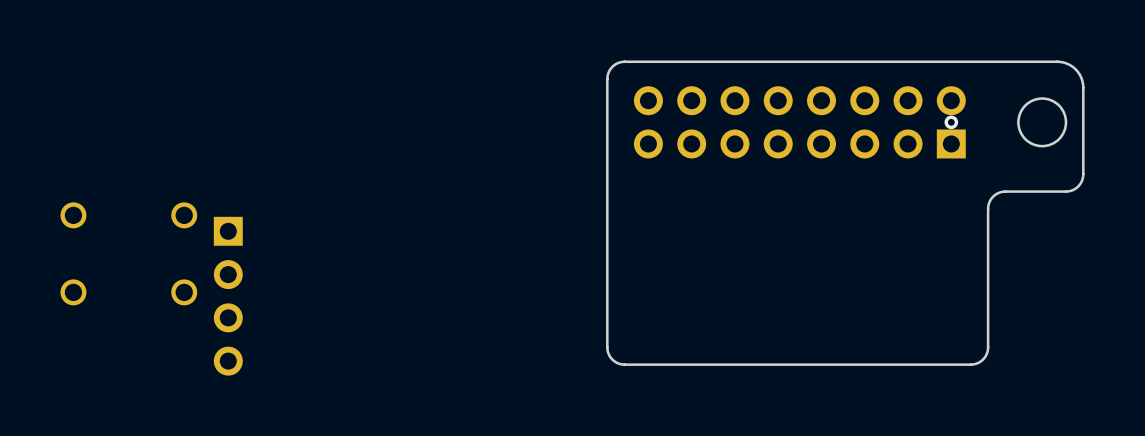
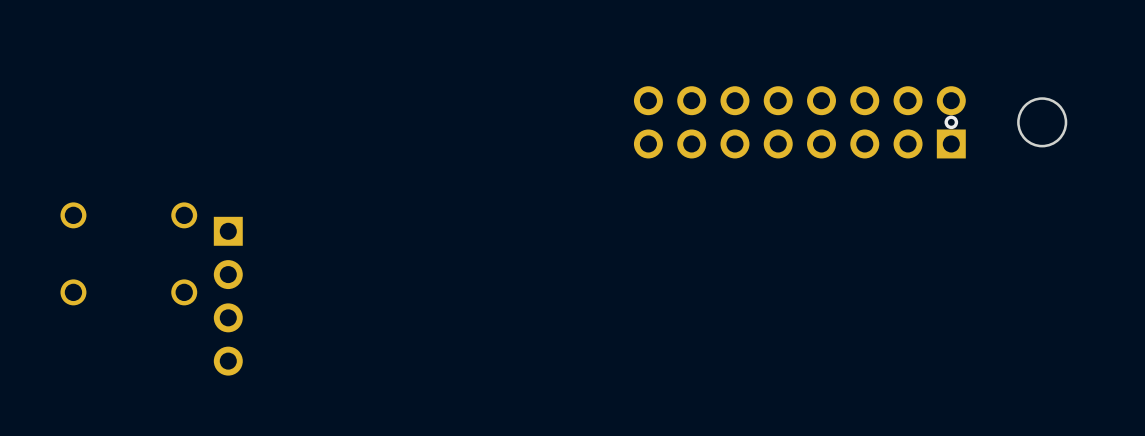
board edge: (1057, 61) (624, 61) (615, 64) (609, 70) (607, 79) (607, 347) (609, 355) (615, 362) (624, 364) (970, 364) (979, 362) (984, 357) (987, 349) (988, 208) (990, 200) (996, 193) (1003, 191) (1070, 190) (1078, 186) (1082, 178) (1082, 80) (1073, 67) (1057, 61) -> none

